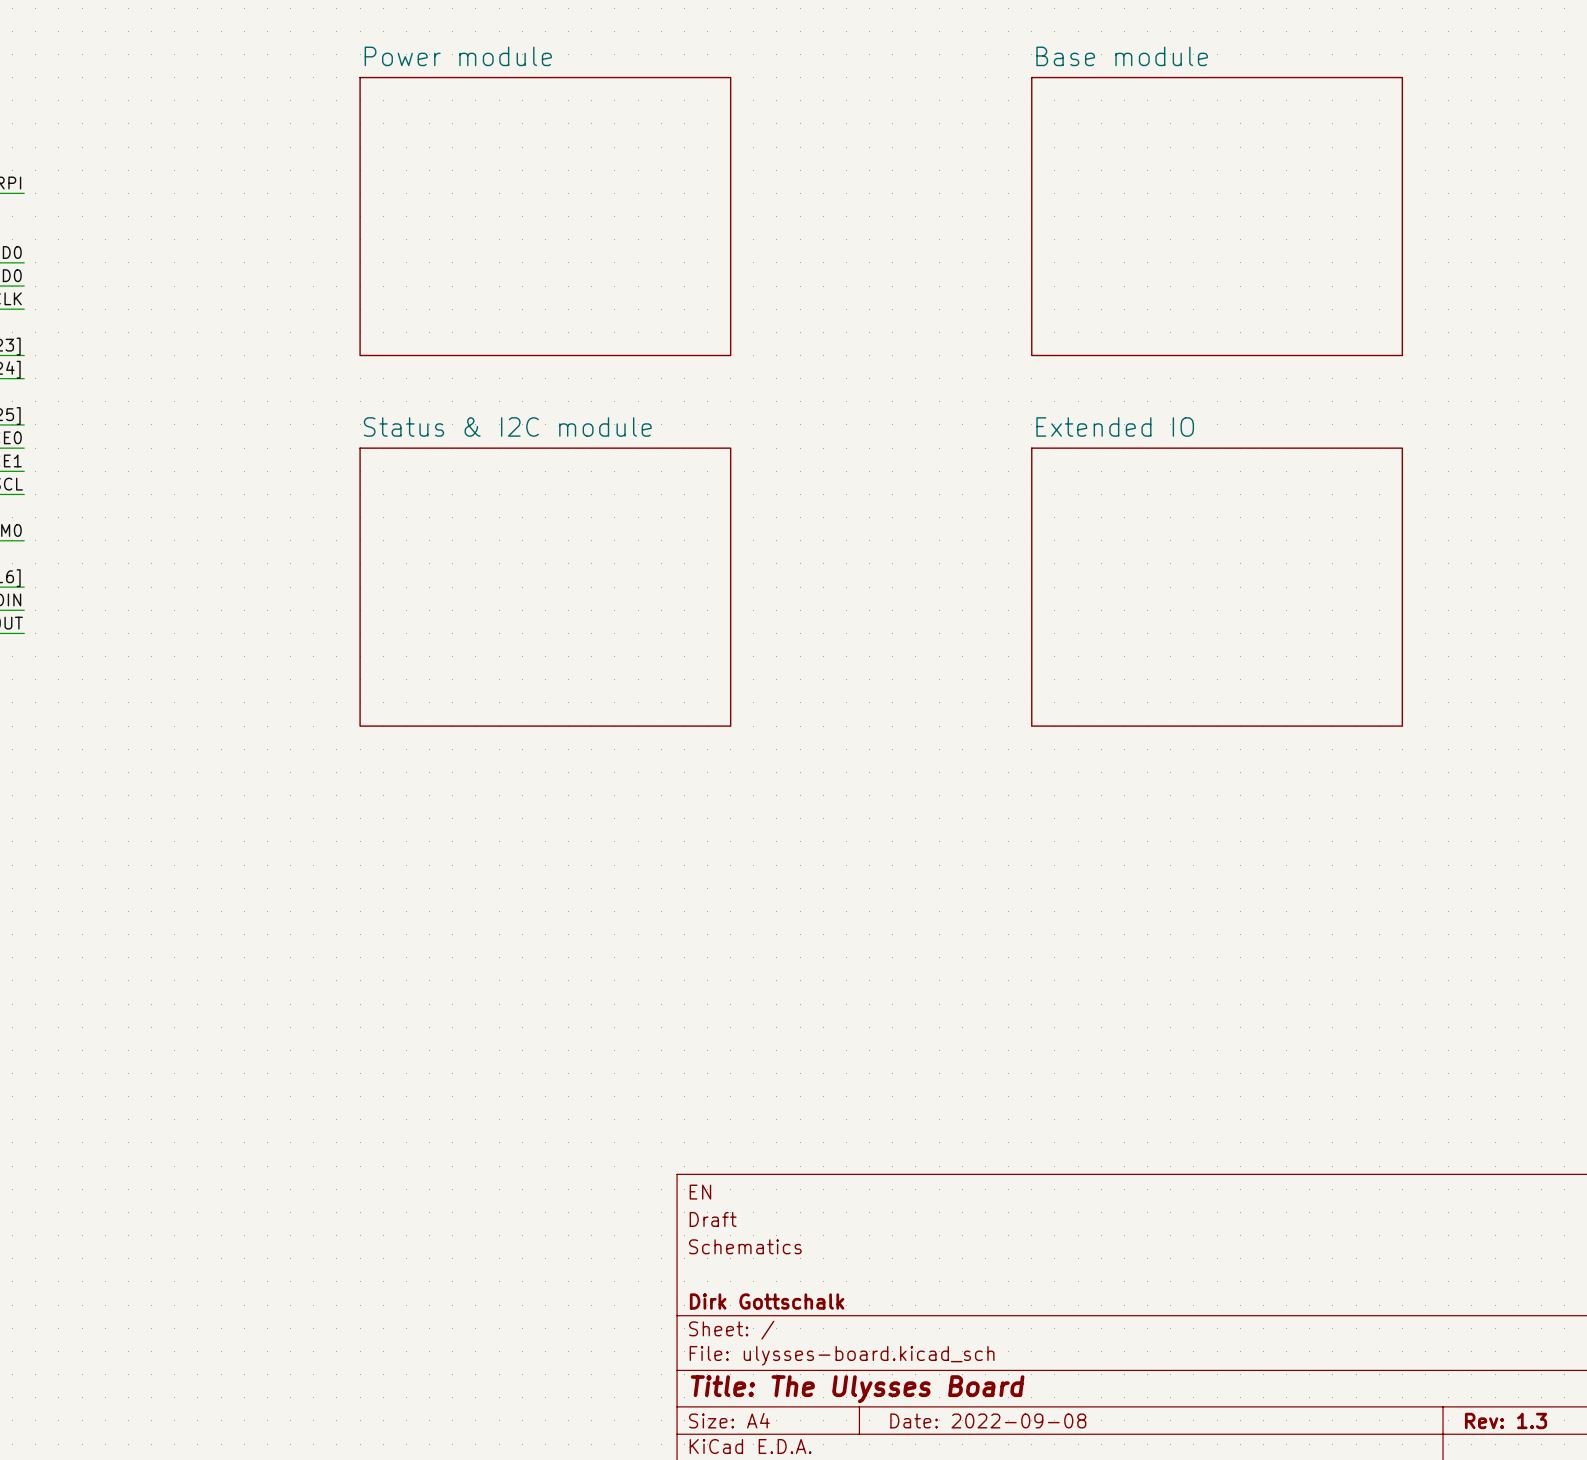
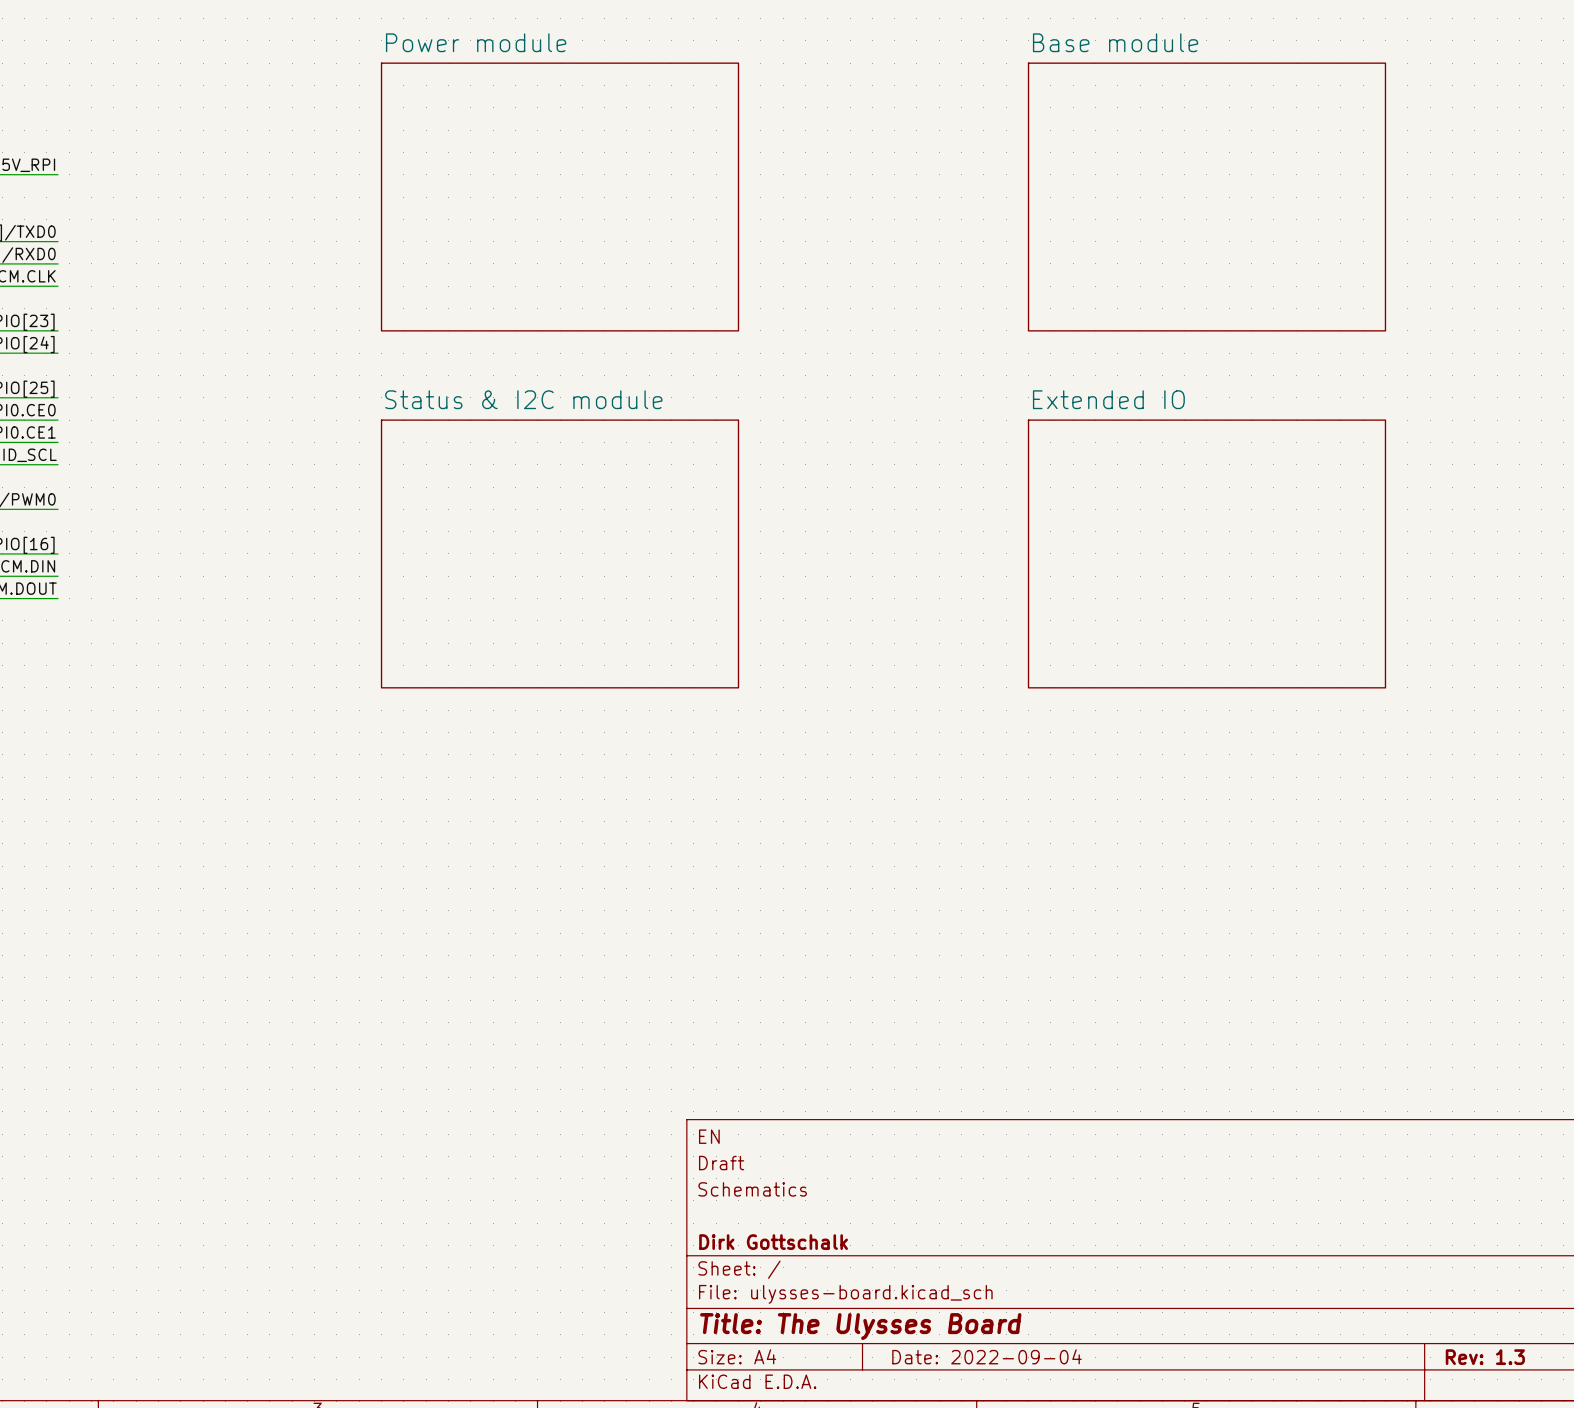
title block: Date: 2022-09-08 (988, 1420) -> Date: 2022-09-04 (986, 1356)

